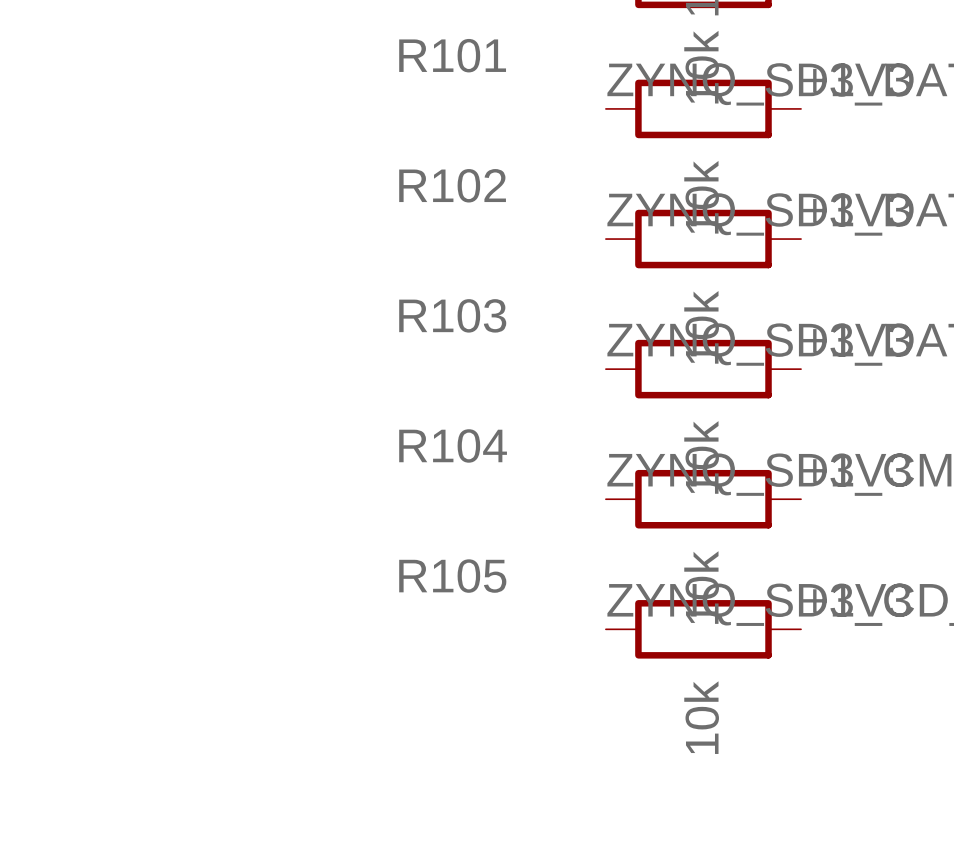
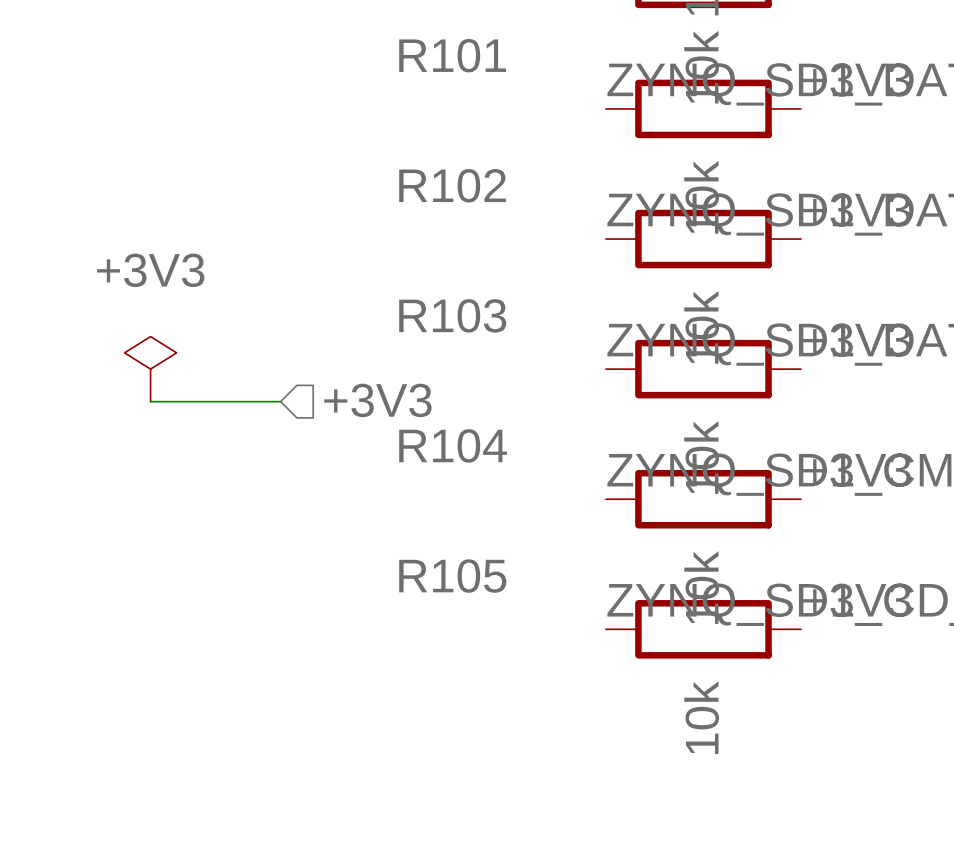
power symbol: none -> +3V3 (150, 369)
hierarchical label: none -> +3V3 (377, 400)
wire: none -> (150, 401) (280, 401)

